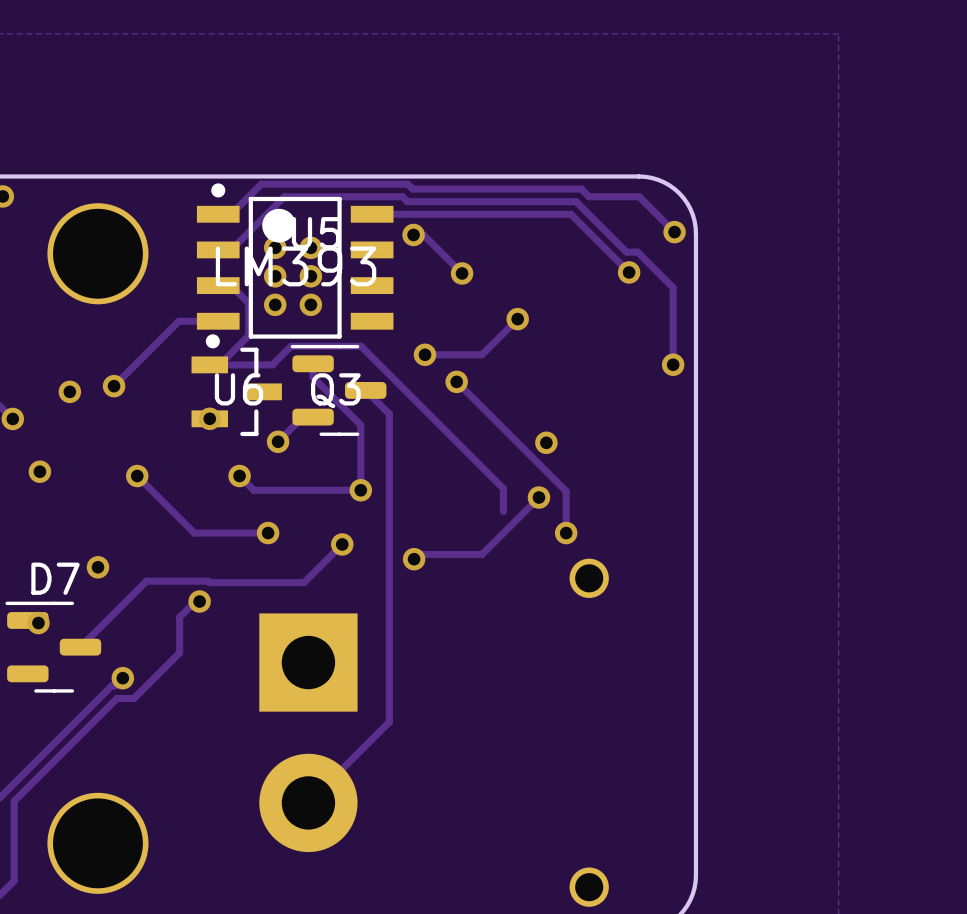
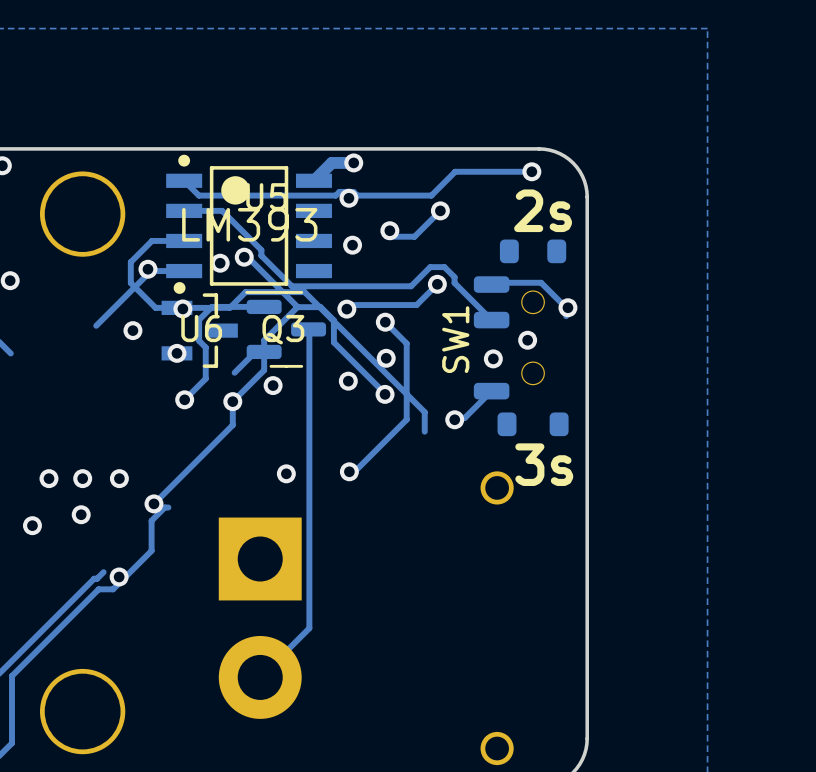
via: none -> (353, 162)
via: none -> (531, 171)
track: (218, 214) (231, 214) (261, 184) (407, 184) (412, 189) (581, 189) (589, 196) (639, 196) (674, 232) -> (184, 180) (198, 195) (335, 195) (339, 191) (353, 191) (357, 195) (431, 195) (455, 171) (531, 171)
track: (372, 214) (570, 214) (629, 272) -> (313, 180) (331, 162) (353, 162)
via: (674, 232) -> none
track: (413, 234) (423, 234) (462, 273) -> none
via: (275, 247) -> none
via: (310, 247) -> none
track: (231, 249) (284, 196) (402, 196) (407, 201) (576, 201) (626, 252) (637, 252) (673, 287) (673, 364) -> (195, 210) (222, 210) (261, 250) (261, 255) (291, 286) (411, 286) (430, 267) (444, 267) (454, 277) (454, 283) (491, 320)
track: none -> (440, 210) (414, 236) (386, 236)
via: none -> (440, 210)
text: none -> 2s (543, 210)
via: (629, 272) -> none
via: (275, 276) -> none
via: (310, 276) -> none
track: (218, 285) (231, 285) (248, 303) (248, 335) (219, 364) -> (184, 240) (151, 240) (130, 262) (130, 283) (155, 307) (176, 307)
via: none -> (352, 245)
via: (275, 304) -> none
track: none -> (244, 257) (247, 257) (297, 307)
via: none -> (244, 257)
via: (310, 304) -> none
via: none -> (220, 263)
via: none -> (147, 269)
track: (517, 319) (482, 354) (424, 354) -> none
via position: (517, 319) -> (437, 284)
via: none -> (10, 280)
track: none -> (437, 284) (416, 305) (350, 305) (346, 309)
track: none -> (491, 284) (493, 282) (541, 282) (566, 307) (566, 316)
via position: (424, 354) -> (346, 309)
track: (313, 363) (313, 377) (360, 425) (360, 490) (253, 490) (239, 476) -> (264, 306) (212, 306) (199, 319) (199, 340) (205, 347) (205, 378) (184, 399)
via: none -> (182, 308)
via: (114, 386) -> none
via: (69, 391) -> none
via: none -> (132, 330)
track: (366, 391) (389, 414) (389, 722) (366, 744) -> (309, 330) (309, 628)
SW1: none -> (521, 337)
via: none -> (527, 340)
track: (482, 407) (566, 491) (566, 533) -> (406, 343) (406, 419) (352, 473) (346, 473)
via: (12, 418) -> none
via: none -> (386, 358)
via: (278, 441) -> none
via position: (546, 442) -> (493, 358)
via: none -> (348, 381)
via: none -> (273, 385)
track: none -> (491, 391) (464, 417) (457, 417)
track: none -> (385, 394) (333, 342) (333, 320) (320, 307) (297, 307) (264, 340) (264, 370) (232, 401) (232, 425) (153, 503)
via: none -> (385, 394)
via: (39, 471) -> none
track: (137, 476) (194, 533) (268, 533) -> none
via: (137, 476) -> none
via position: (239, 476) -> (184, 399)
via: none -> (232, 401)
via: (360, 490) -> none
track: (538, 497) (482, 554) (418, 554) (414, 559) -> none
via: (268, 533) -> none
via: (566, 533) -> none
track: (342, 544) (304, 582) (146, 581) (80, 647) -> none
via position: (342, 544) -> (286, 473)
text: none -> 3s (544, 464)
via: none -> (48, 478)
via: none -> (119, 478)
via position: (199, 601) -> (153, 503)
via: none -> (81, 514)
D7: (53, 647) -> none
via position: (122, 678) -> (119, 576)

